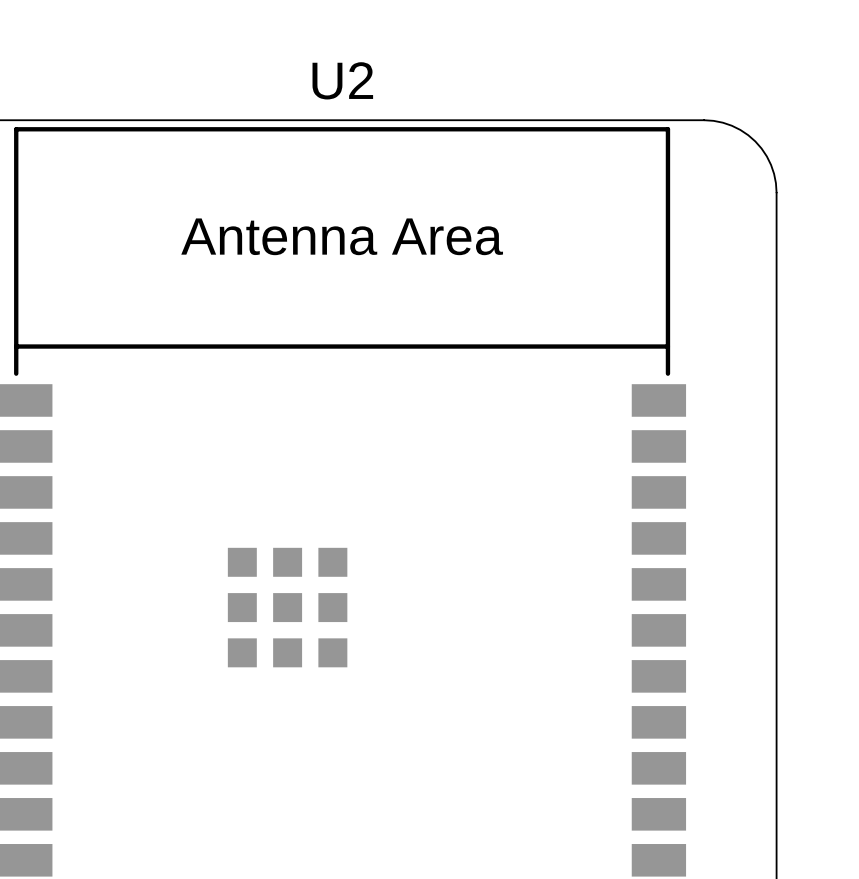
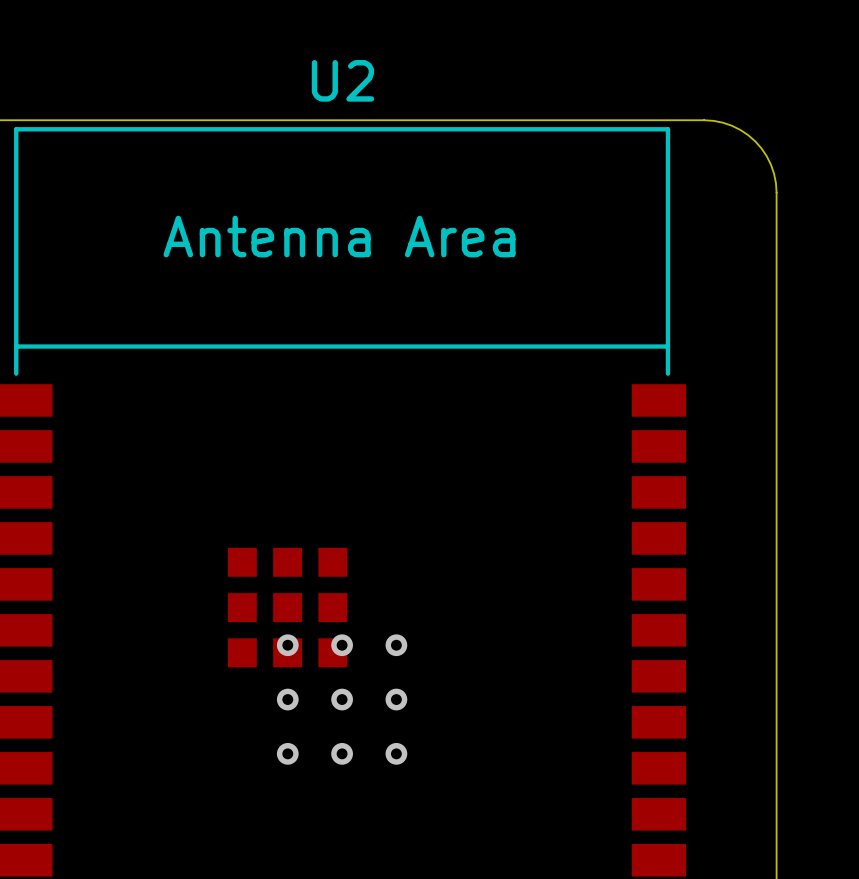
via: none -> (287, 645)
via: none -> (342, 645)
via: none -> (396, 645)
via: none -> (287, 699)
via: none -> (342, 699)
via: none -> (396, 699)
via: none -> (287, 753)
via: none -> (342, 753)
via: none -> (396, 753)

